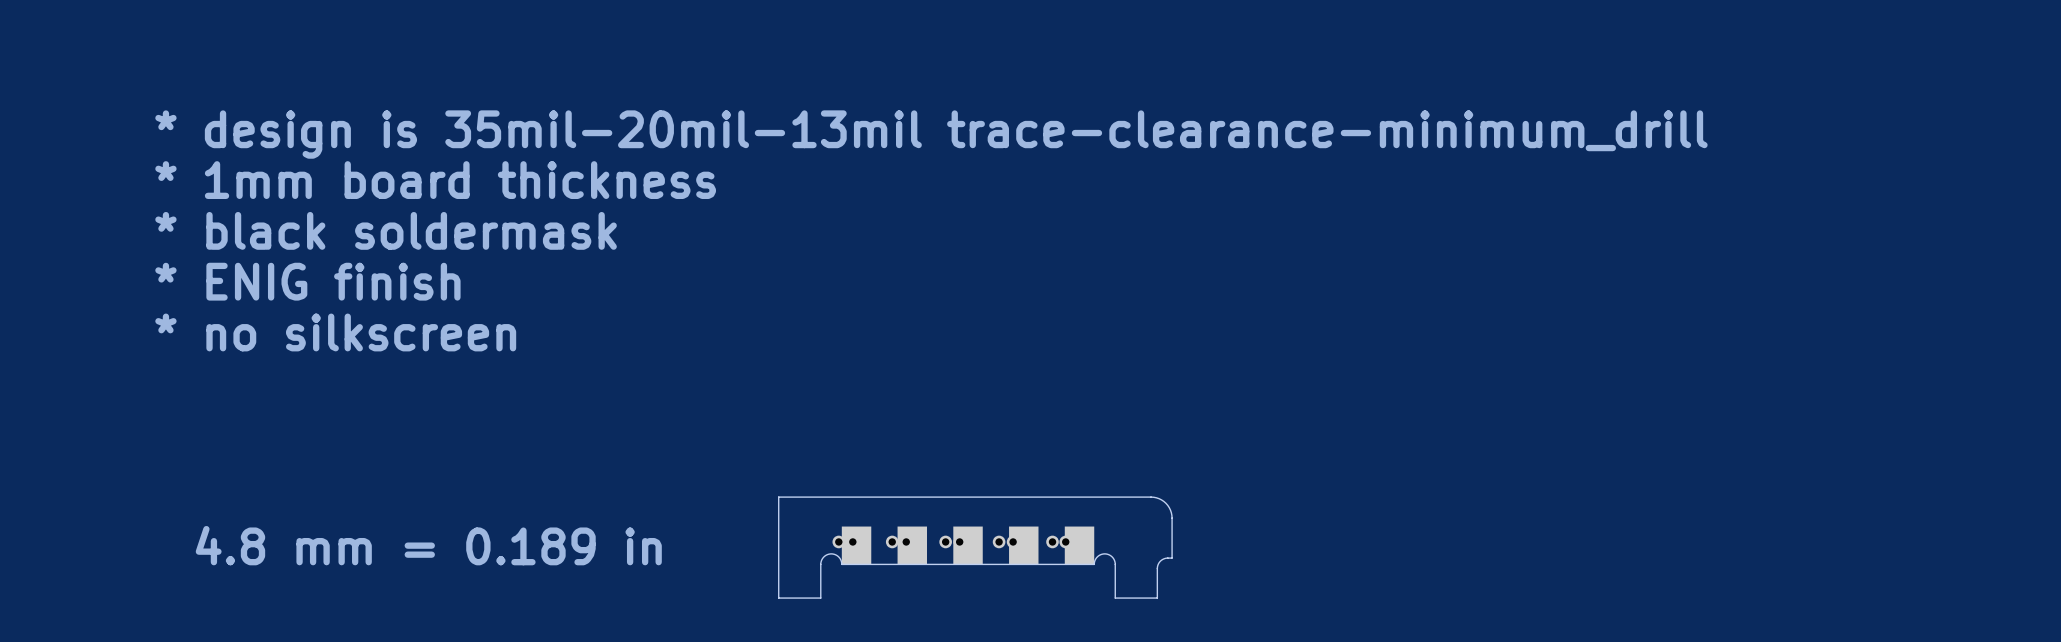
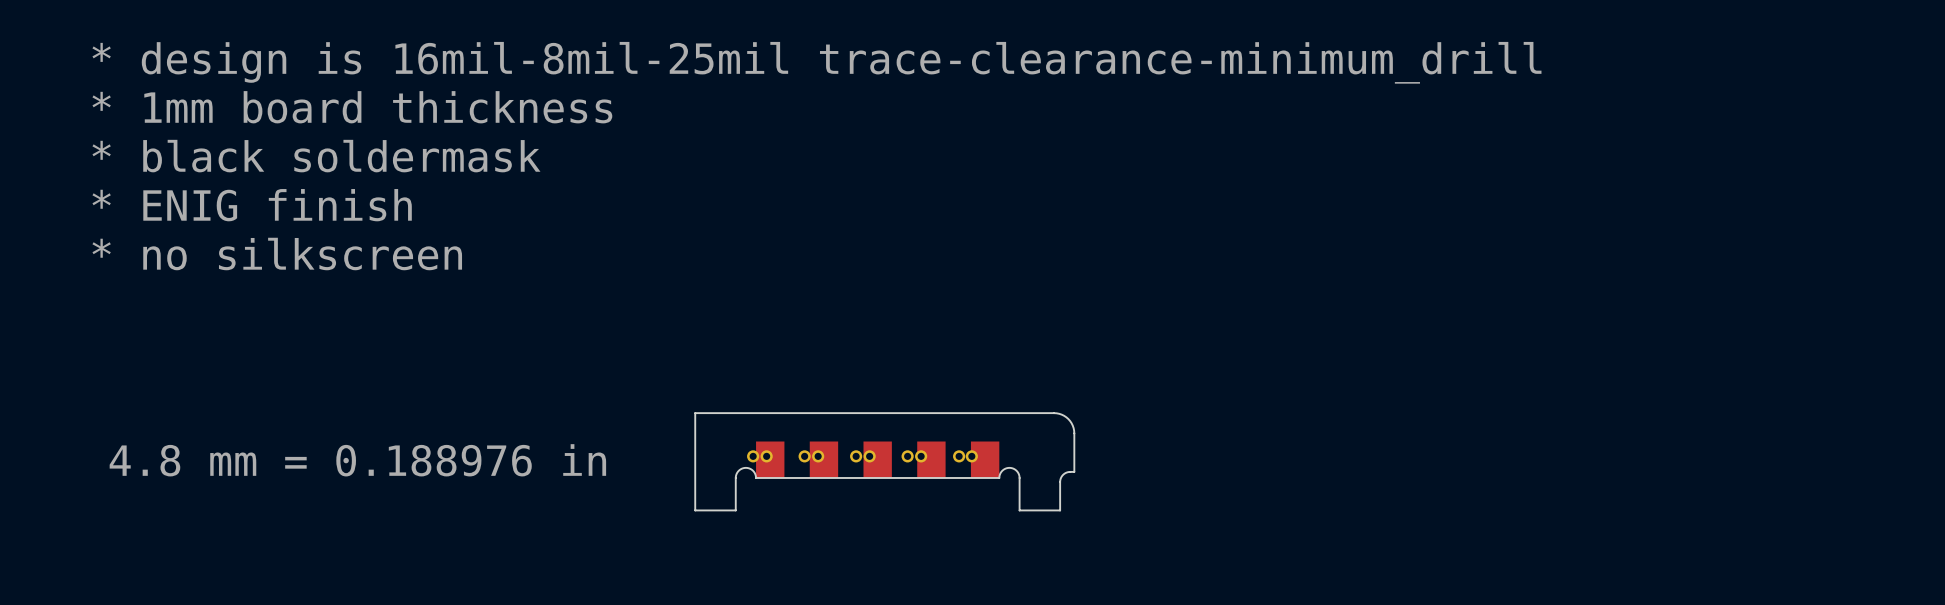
text: * design is 35mil-20mil-13mil trace-clearance-minimum_drill (931, 134) -> * design is 16mil-8mil-25mil trace-clearance-minimum_drill (816, 62)
text: 4.8 mm = 0.189 in (428, 545) -> 4.8 mm = 0.188976 in (357, 460)

